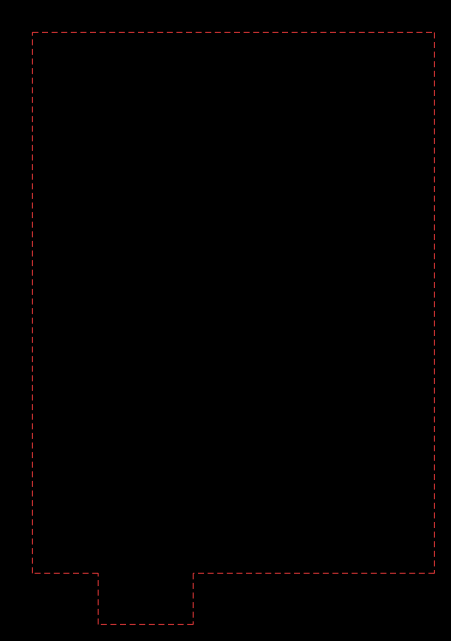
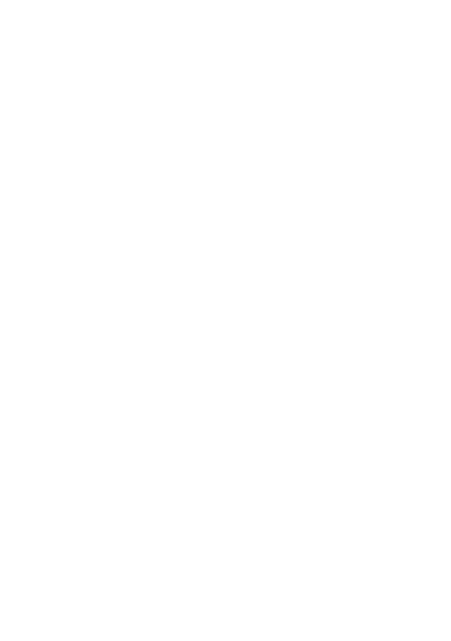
zone outline: (32, 32) (434, 32) (434, 573) (193, 573) (193, 624) (98, 624) (98, 573) (32, 573) (32, 32) -> none

